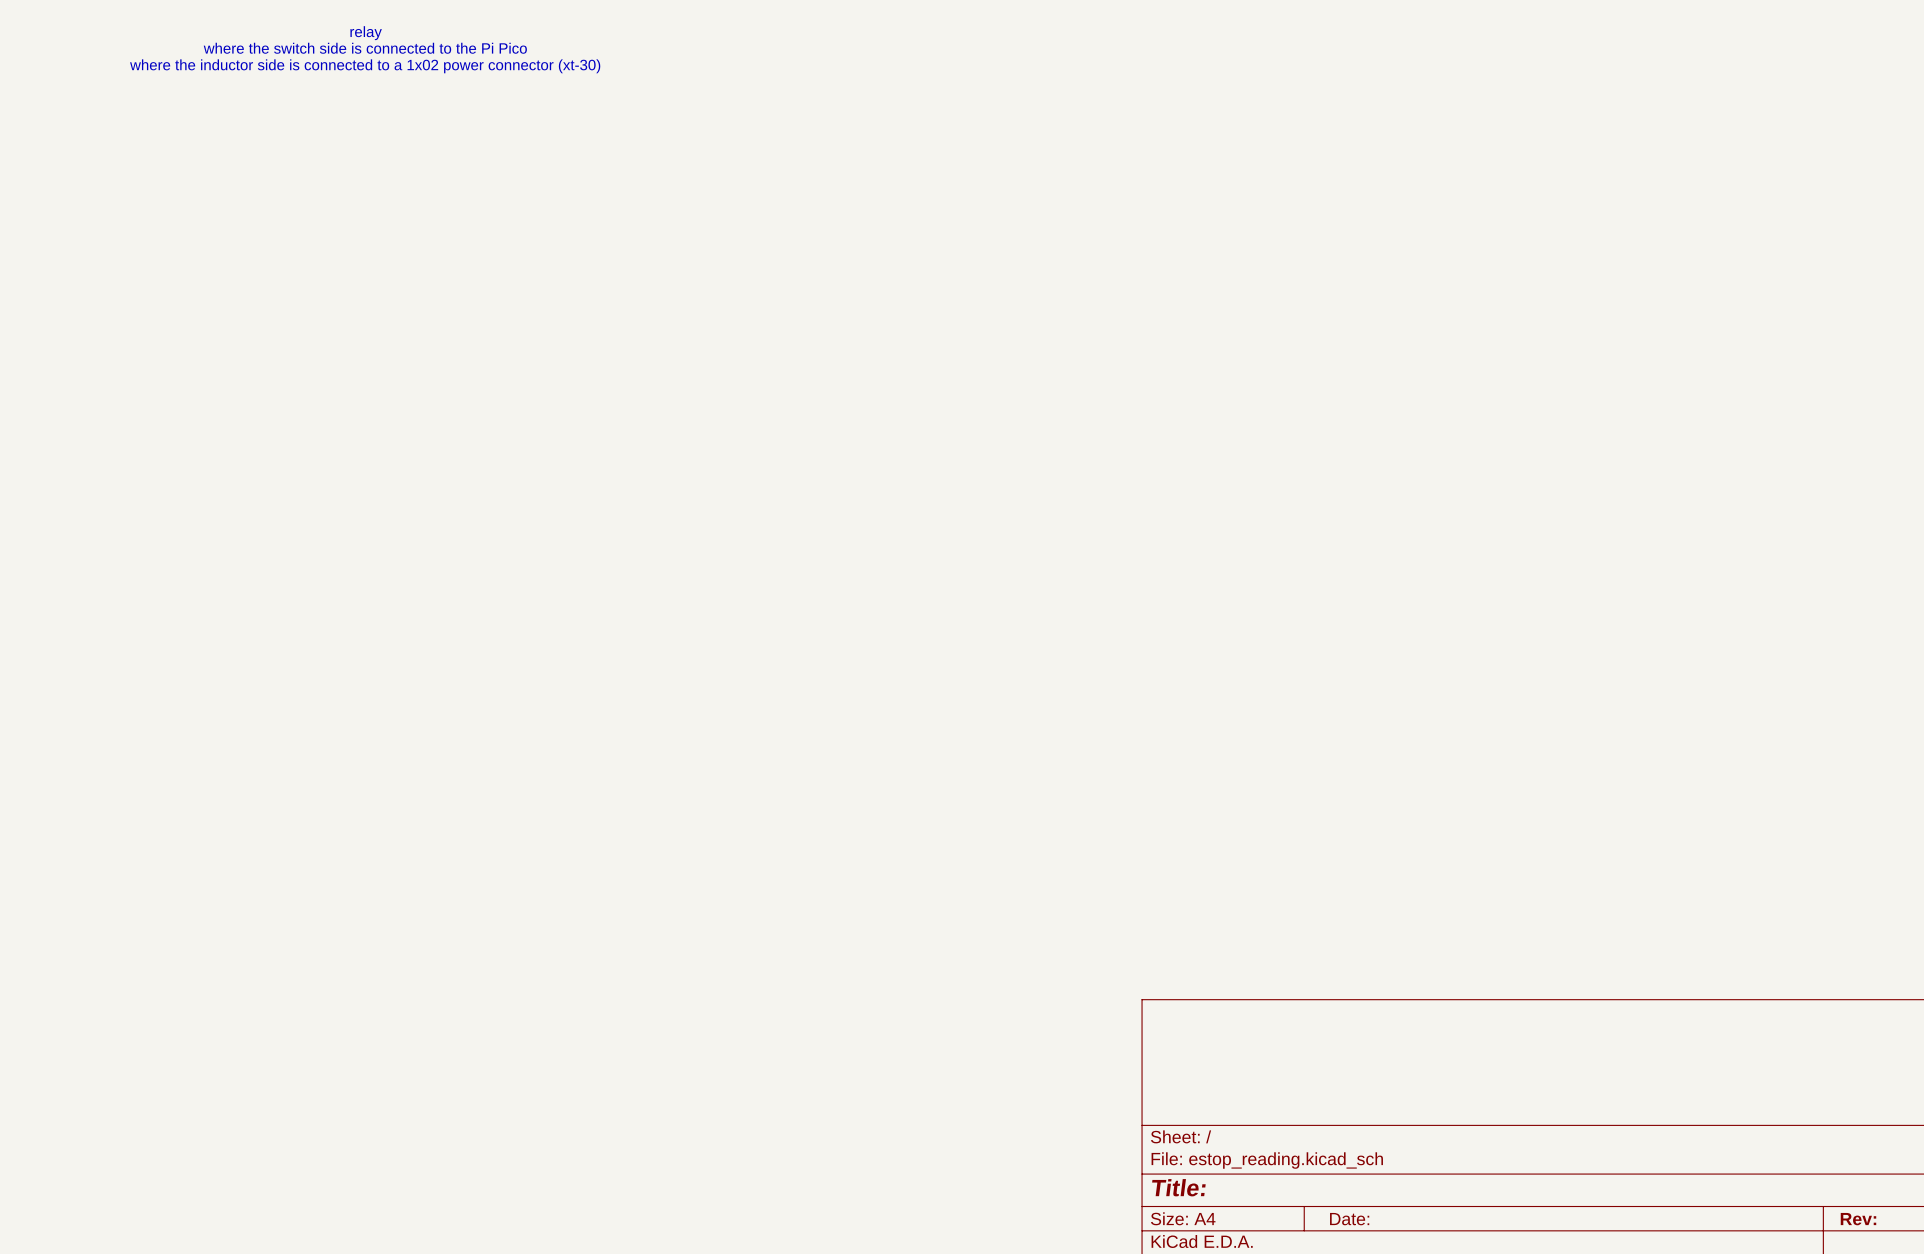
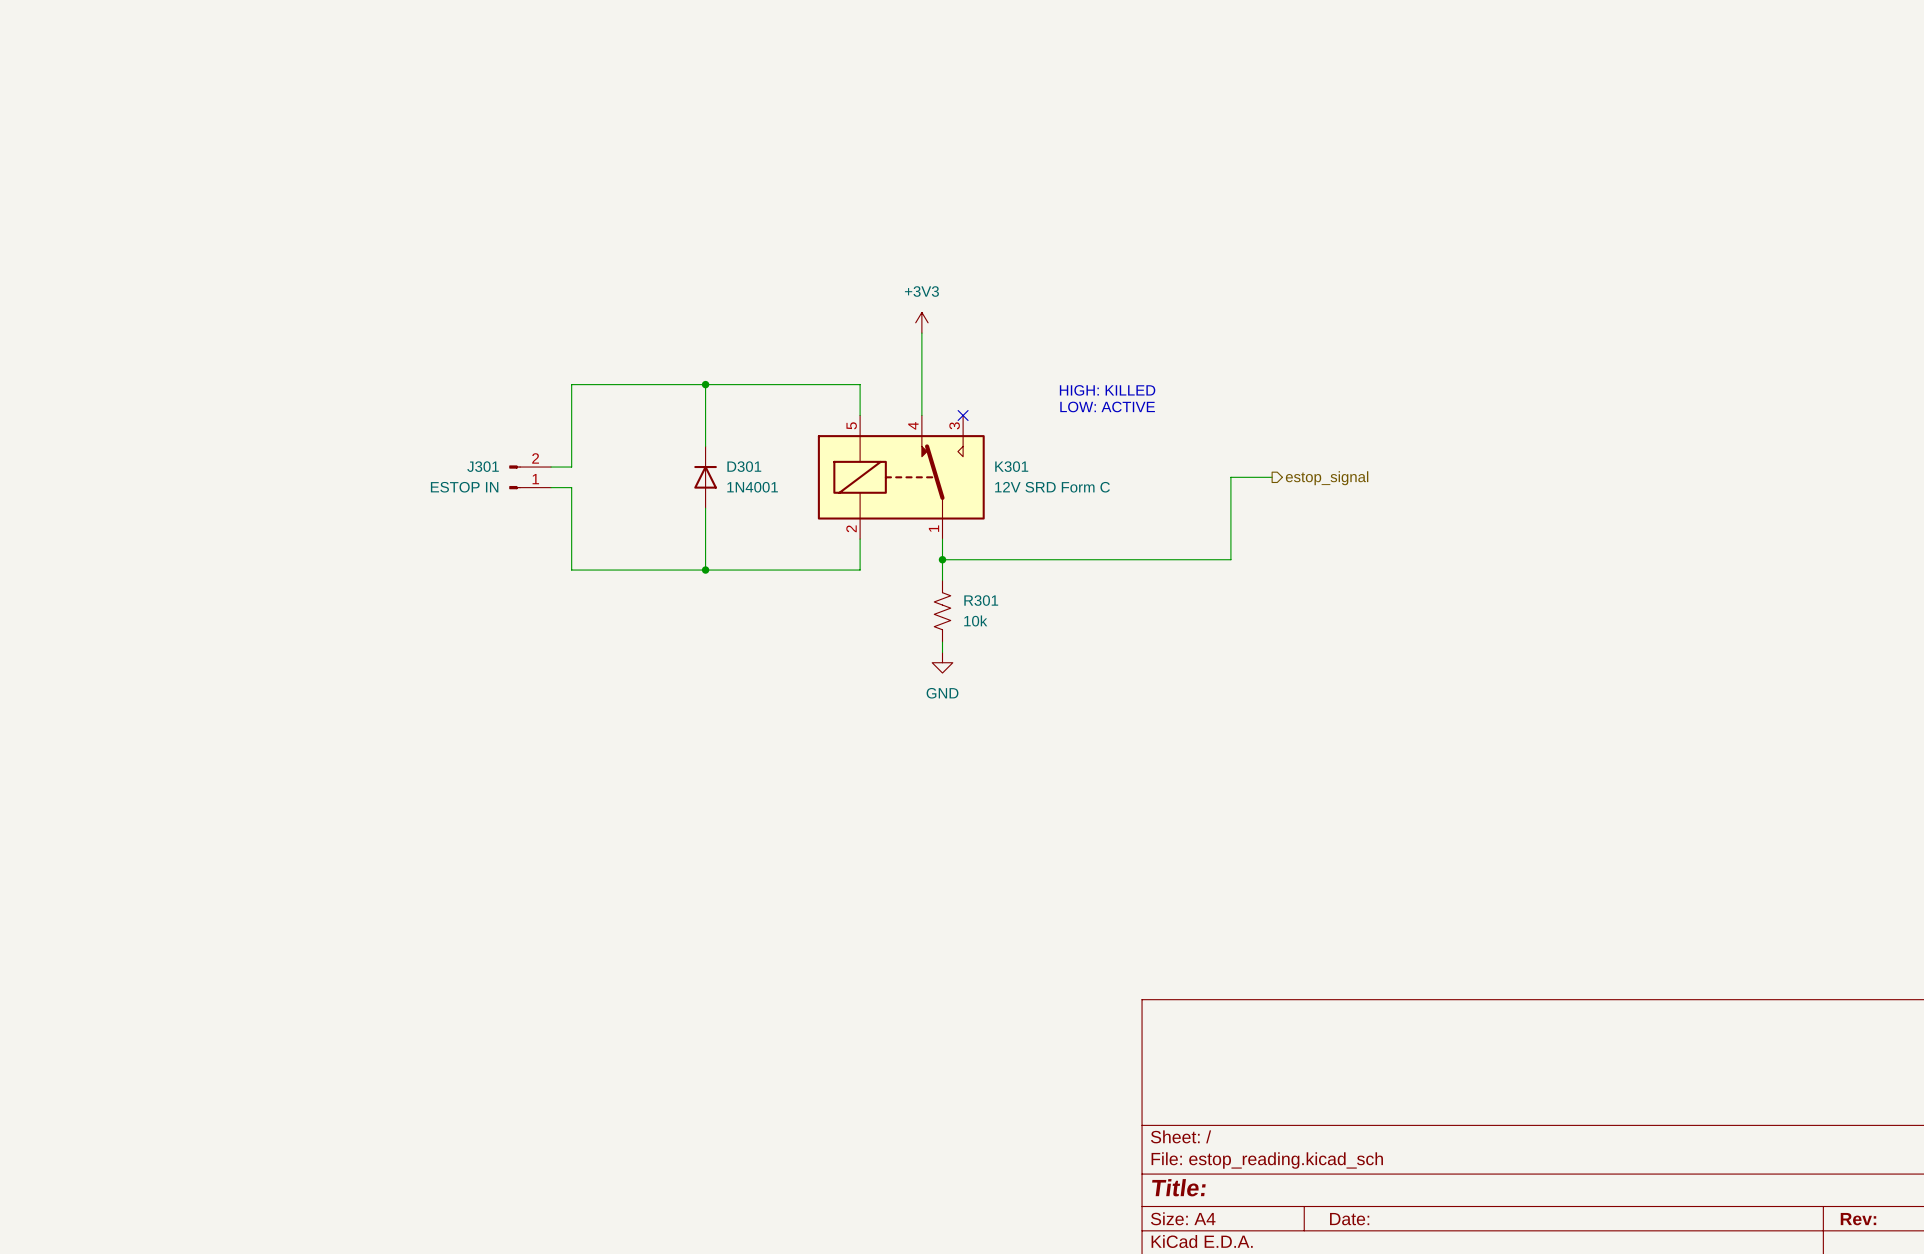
text: relay (366, 33) -> none
text: where the switch side is connected to the Pi Pico (365, 48) -> none
text: where the inductor side is connected to a 1x02 power connector (xt-30) (365, 66) -> none
power symbol: none -> +3V3 (921, 322)
wire: none -> (921, 333) (921, 415)
wire: none -> (705, 384) (705, 446)
junction: none -> (705, 384)
text: none -> HIGH: KILLED (1107, 390)
text: none -> LOW: ACTIVE (1107, 406)
wire: none -> (860, 415) (860, 384) (571, 384) (571, 467) (551, 467)
no-connect mark: none -> (963, 415)
J301: none -> ESTOP IN (530, 477)
D301: none -> 1N4001 (705, 477)
K301: none -> 12V SRD Form C (901, 477)
wire: none -> (1272, 477) (1230, 477) (1230, 559) (942, 559)
hierarchical label: none -> estop_signal (1327, 478)
wire: none -> (551, 487) (571, 487) (571, 570) (860, 570) (860, 539)
wire: none -> (705, 508) (705, 570)
wire: none -> (942, 539) (942, 580)
junction: none -> (942, 559)
junction: none -> (705, 570)
R301: none -> 10k (942, 611)
wire: none -> (942, 642) (942, 652)
power symbol: none -> GND (942, 662)

